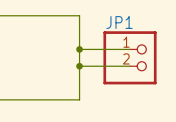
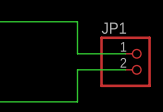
wire: (79, 49) (79, 66) -> none
junction: (79, 49) -> none
junction: (79, 66) -> none

